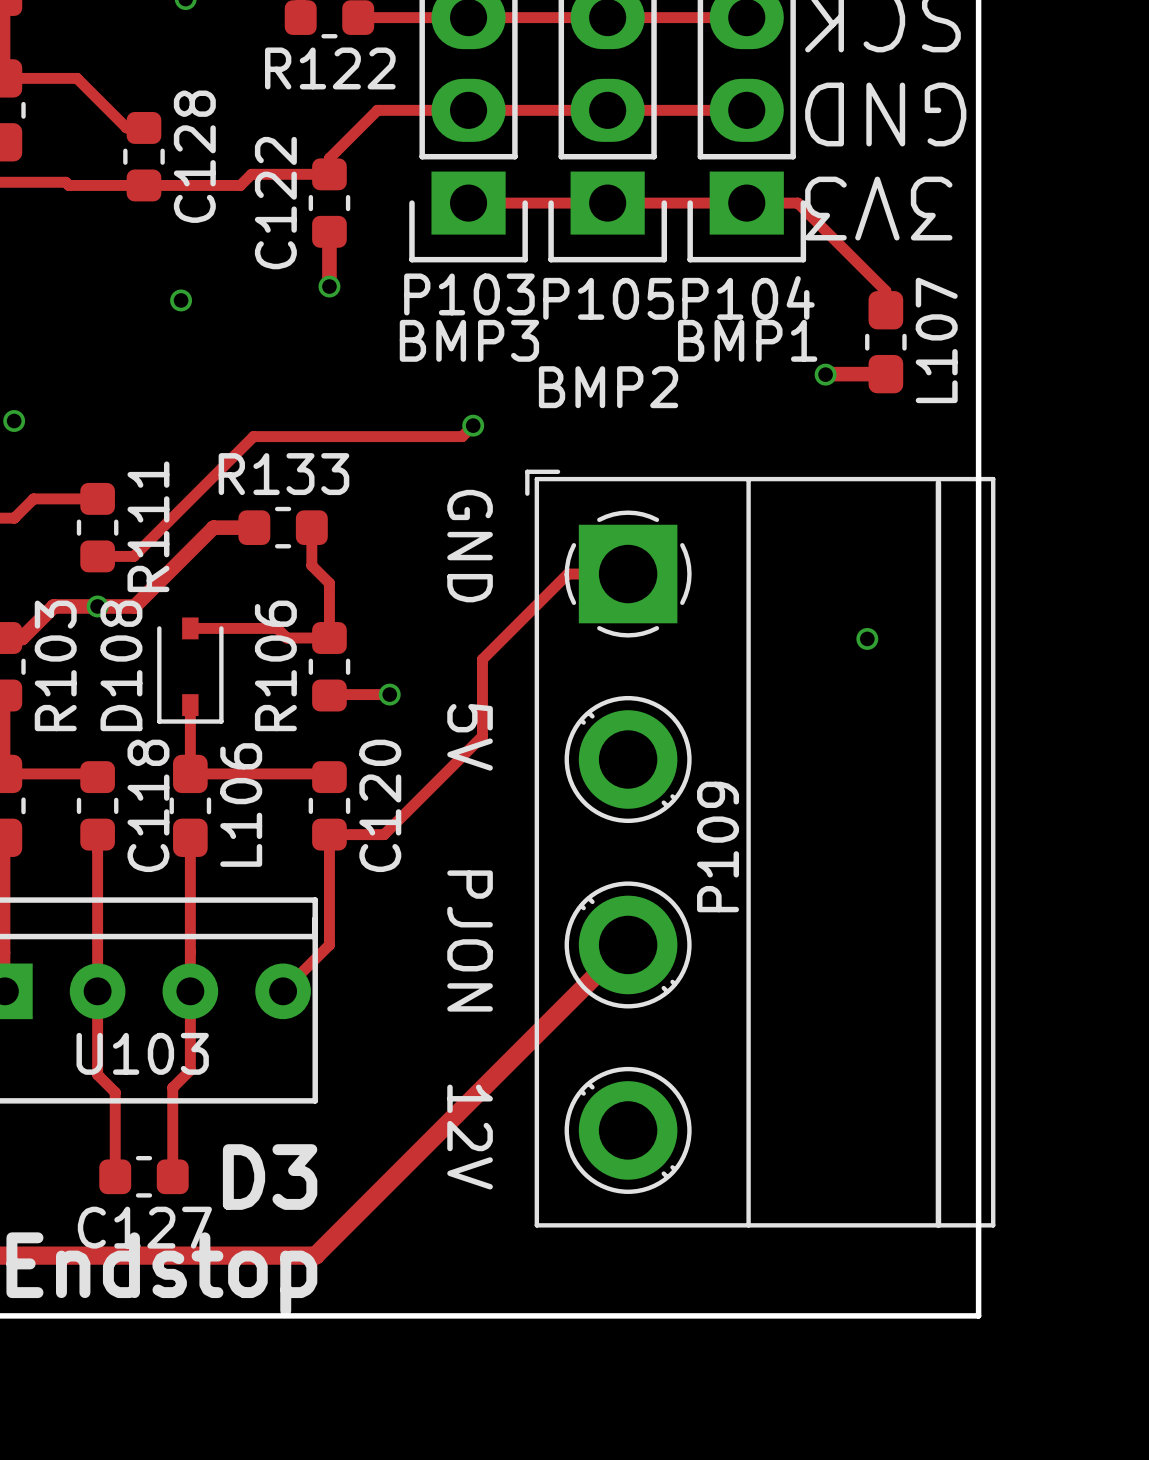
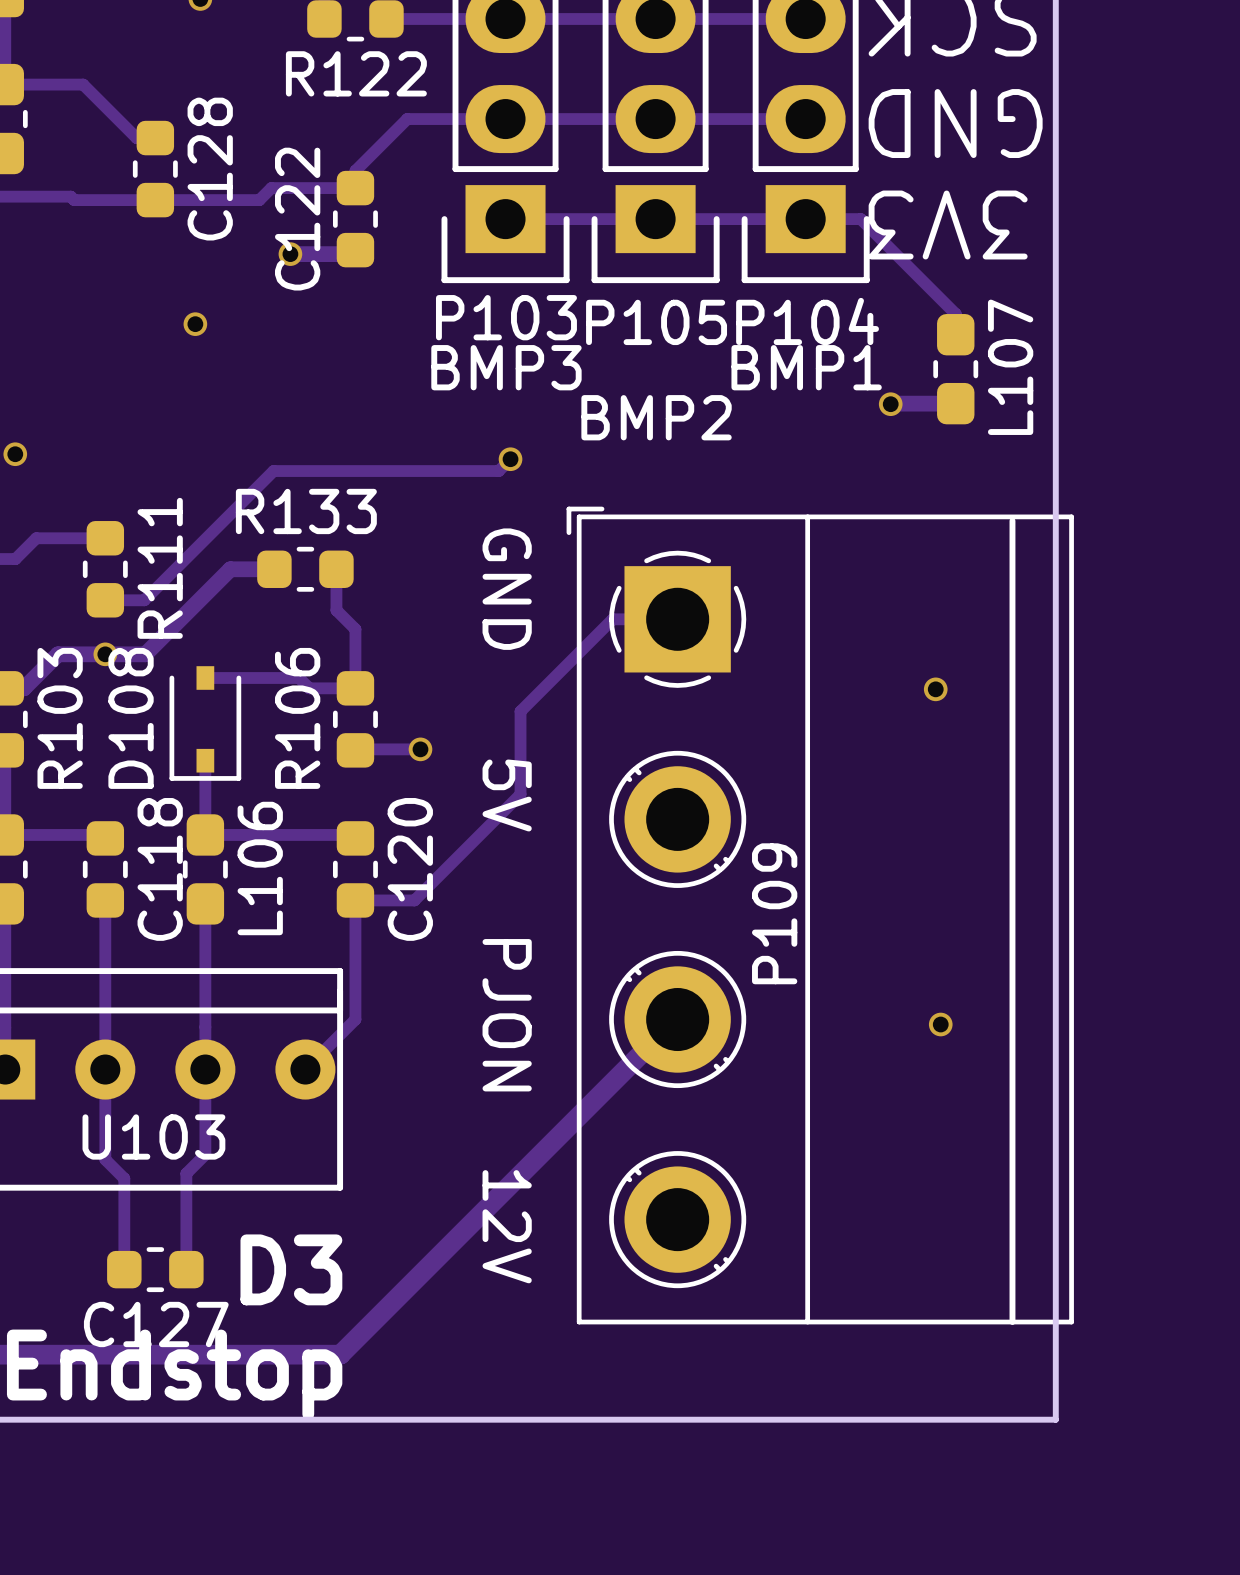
track: (329, 231) (329, 286) -> (355, 250) (351, 254) (290, 254)
via position: (329, 286) -> (290, 254)
via: none -> (940, 1024)

